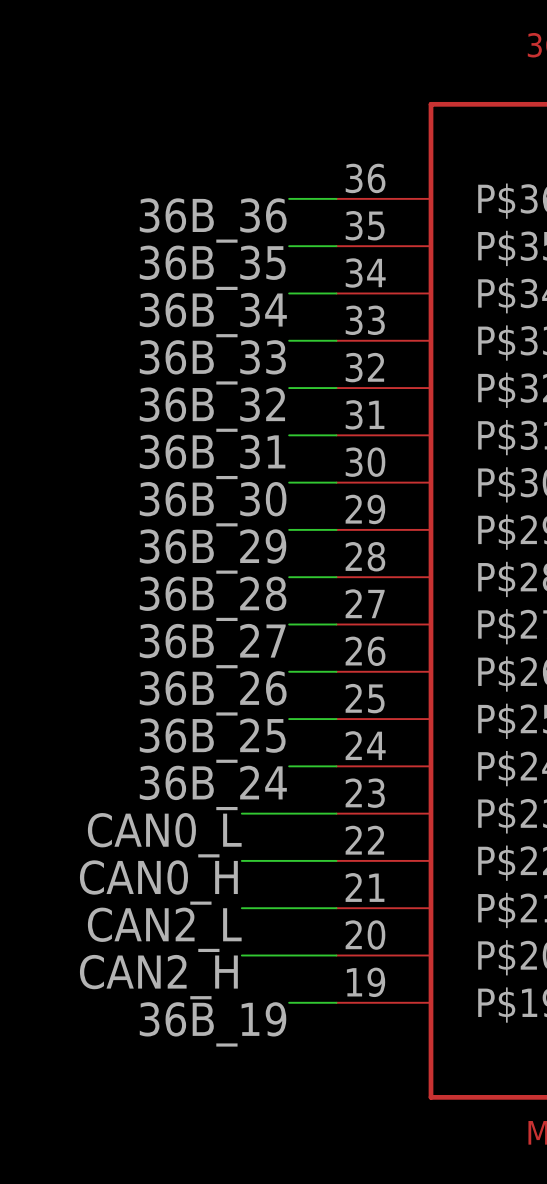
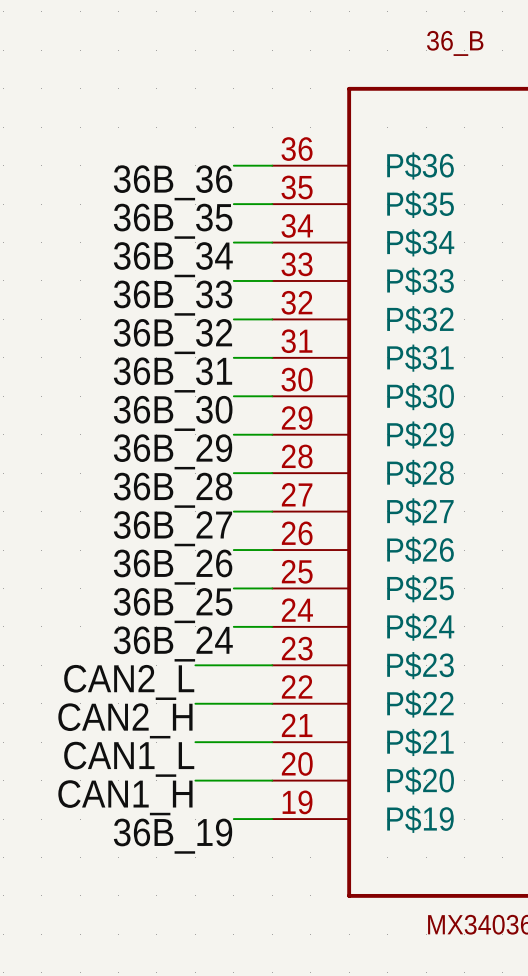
label: CAN0_L (164, 835) -> CAN2_L (129, 682)
label: CAN0_H (158, 882) -> CAN2_H (125, 720)
label: CAN2_L (164, 929) -> CAN1_L (129, 759)
label: CAN2_H (158, 977) -> CAN1_H (125, 797)

